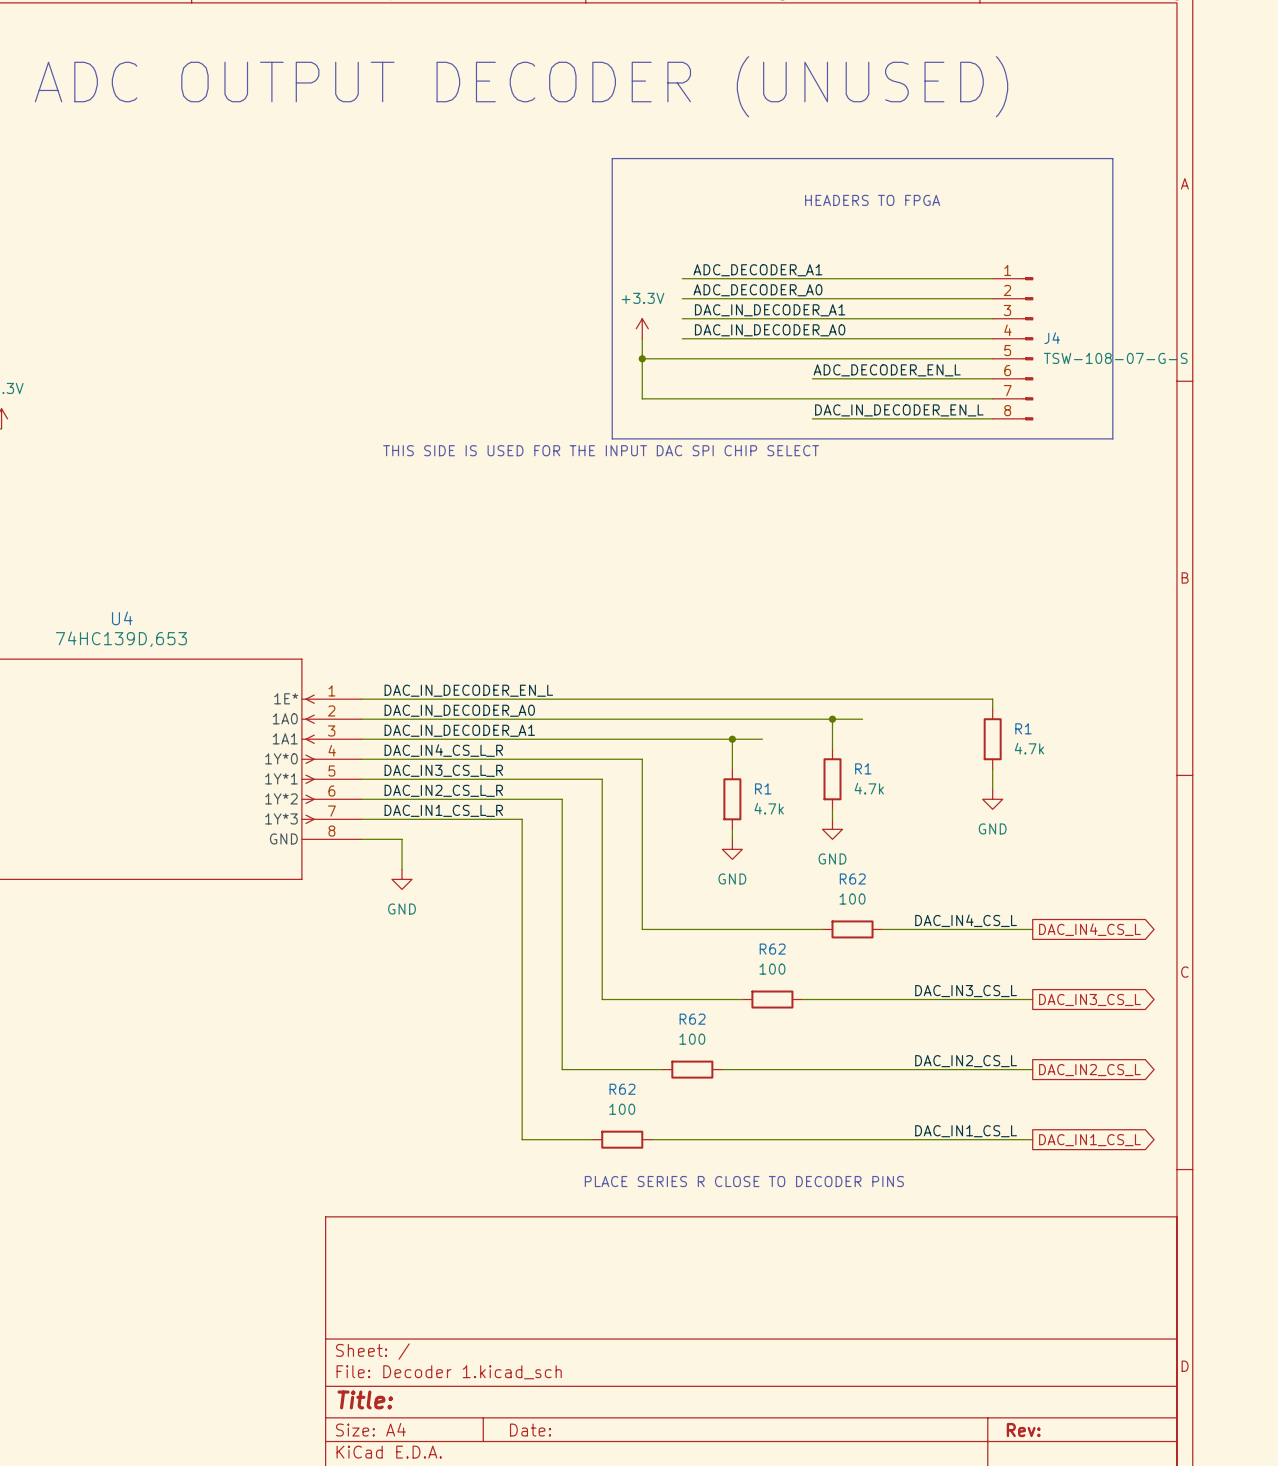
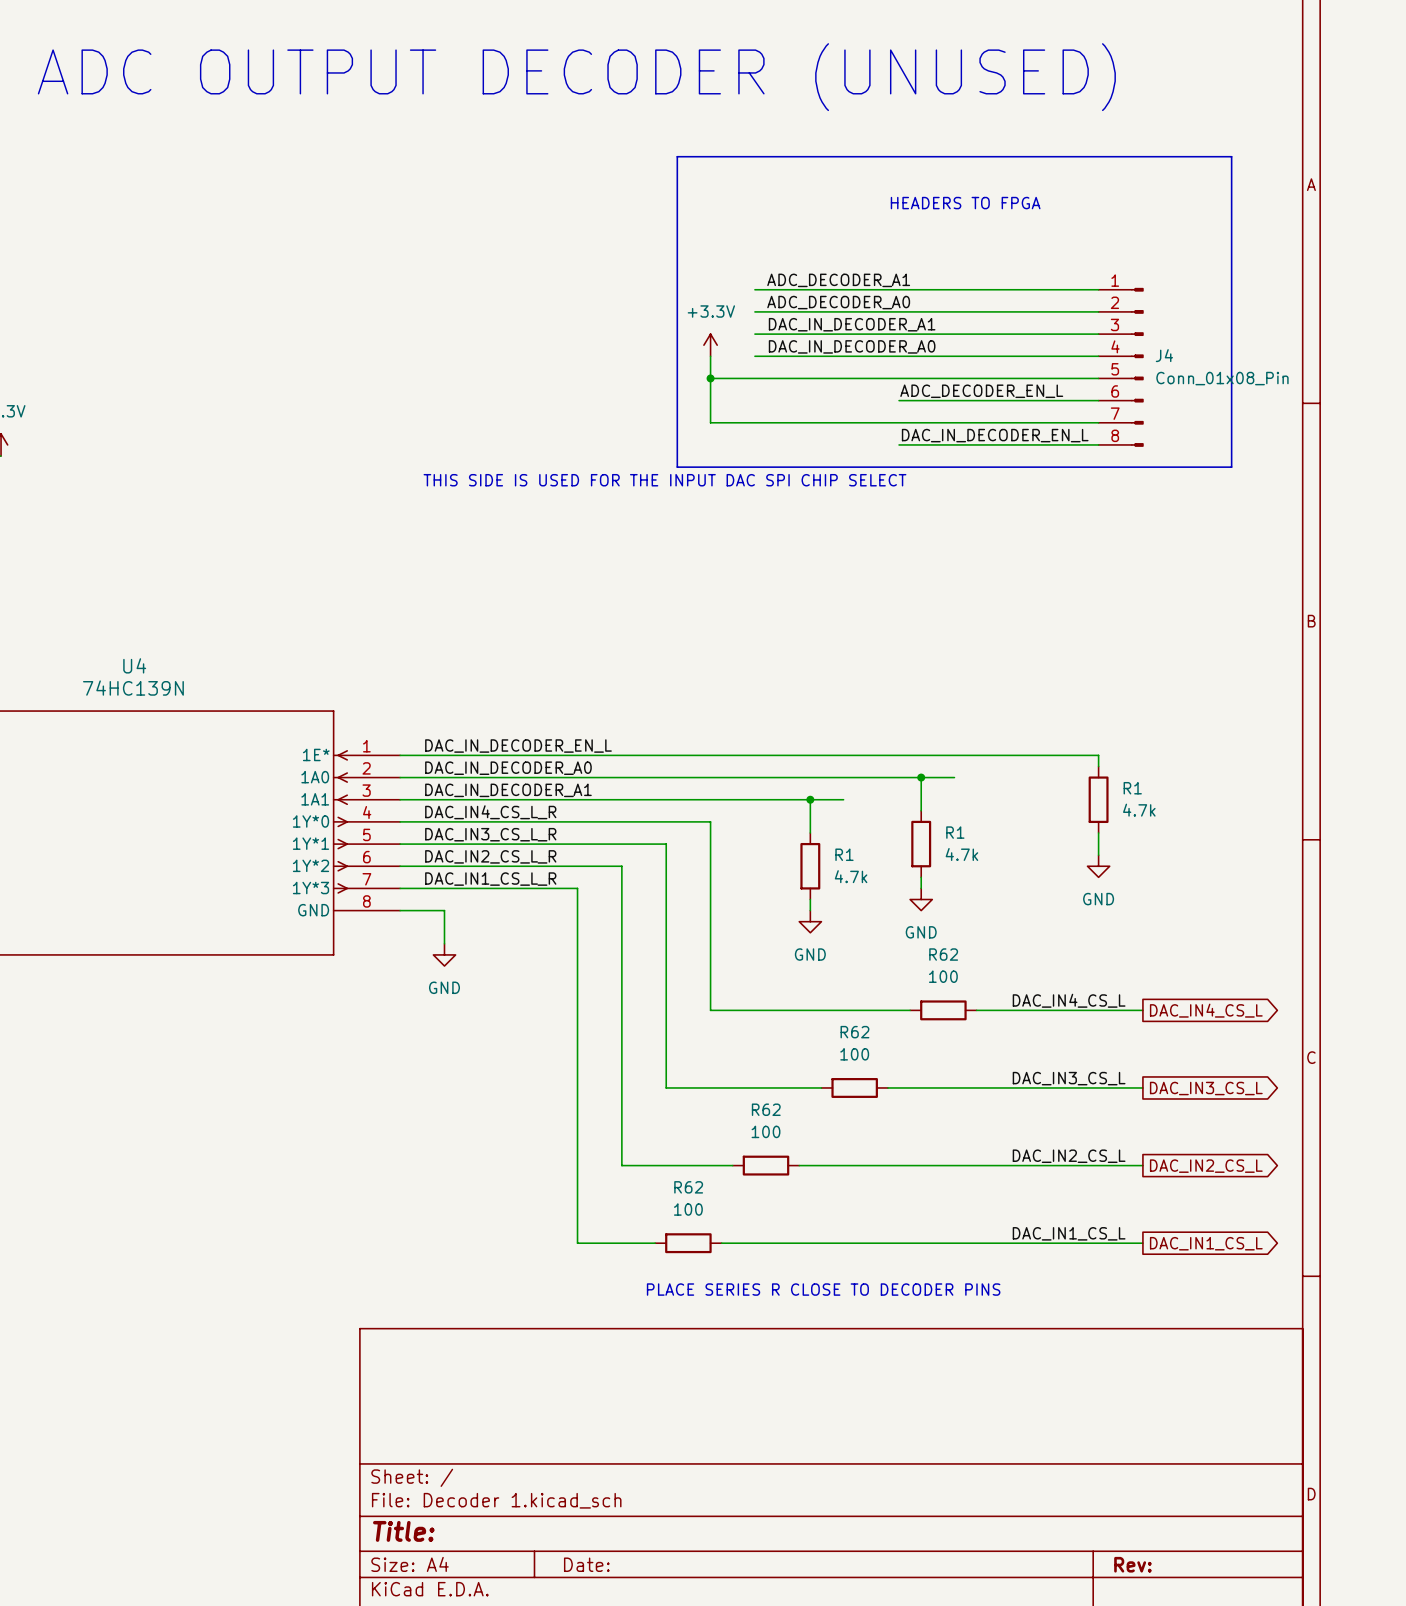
J4 value: TSW-108-07-G-S (1115, 358) -> Conn_01x08_Pin (1222, 378)
U4 value: 74HC139D,653 (121, 639) -> 74HC139N (133, 688)

